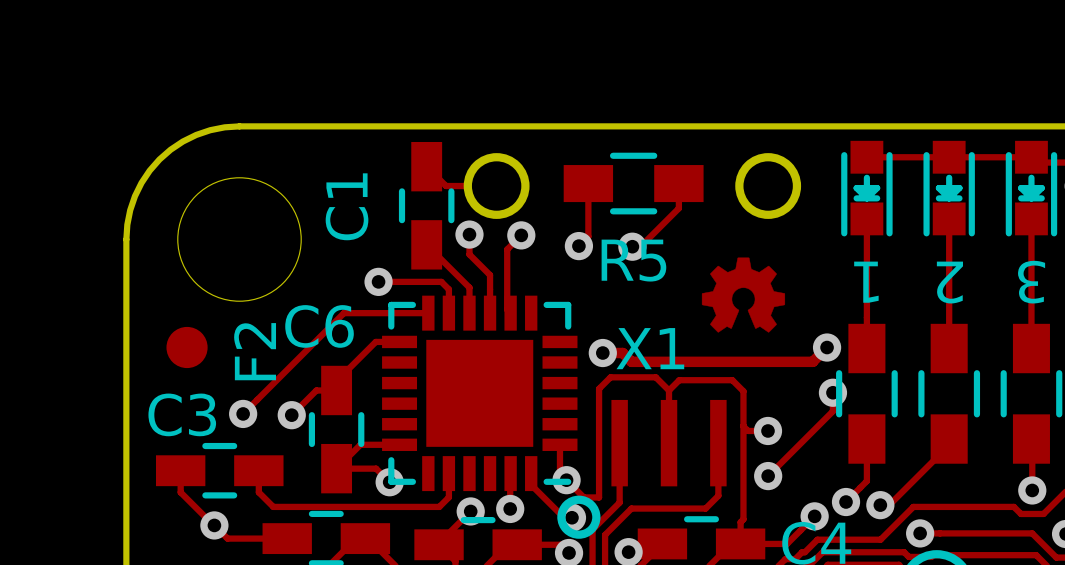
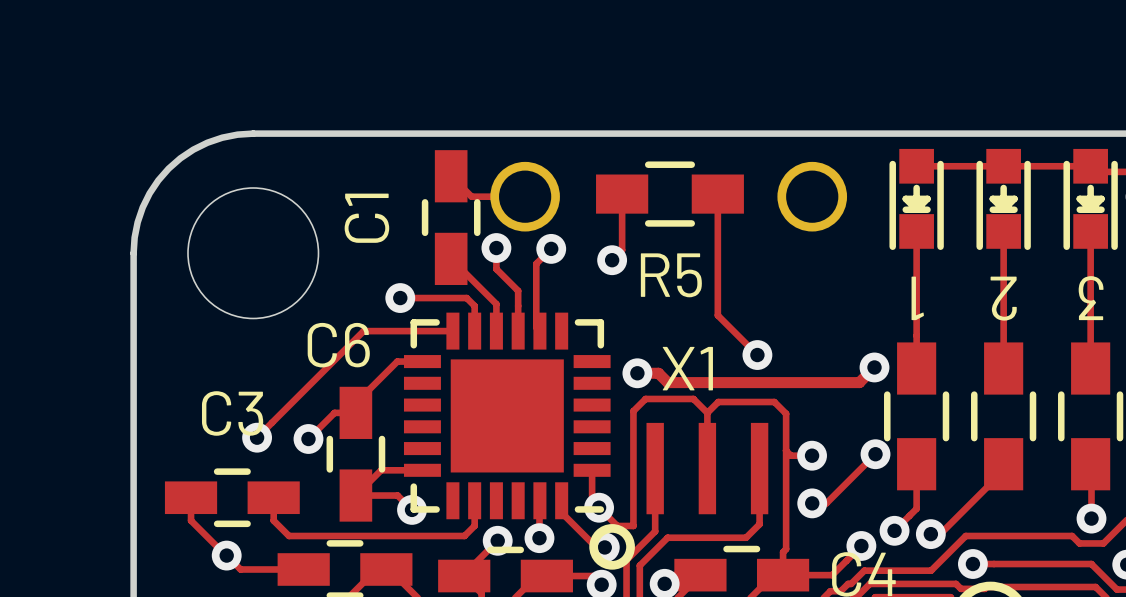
track: (678, 208) (640, 246) (632, 246) -> (717, 220) (717, 315) (757, 355)
via: (632, 246) -> none
drawing: [701, 257, 786, 333] -> none
via: none -> (757, 355)
F2: (187, 347) -> none
track: (832, 392) (832, 411) (768, 476) -> (875, 454) (826, 503) (812, 503)
via position: (832, 392) -> (875, 454)
C3 name position: C3 (182, 414) -> C3 (232, 413)

